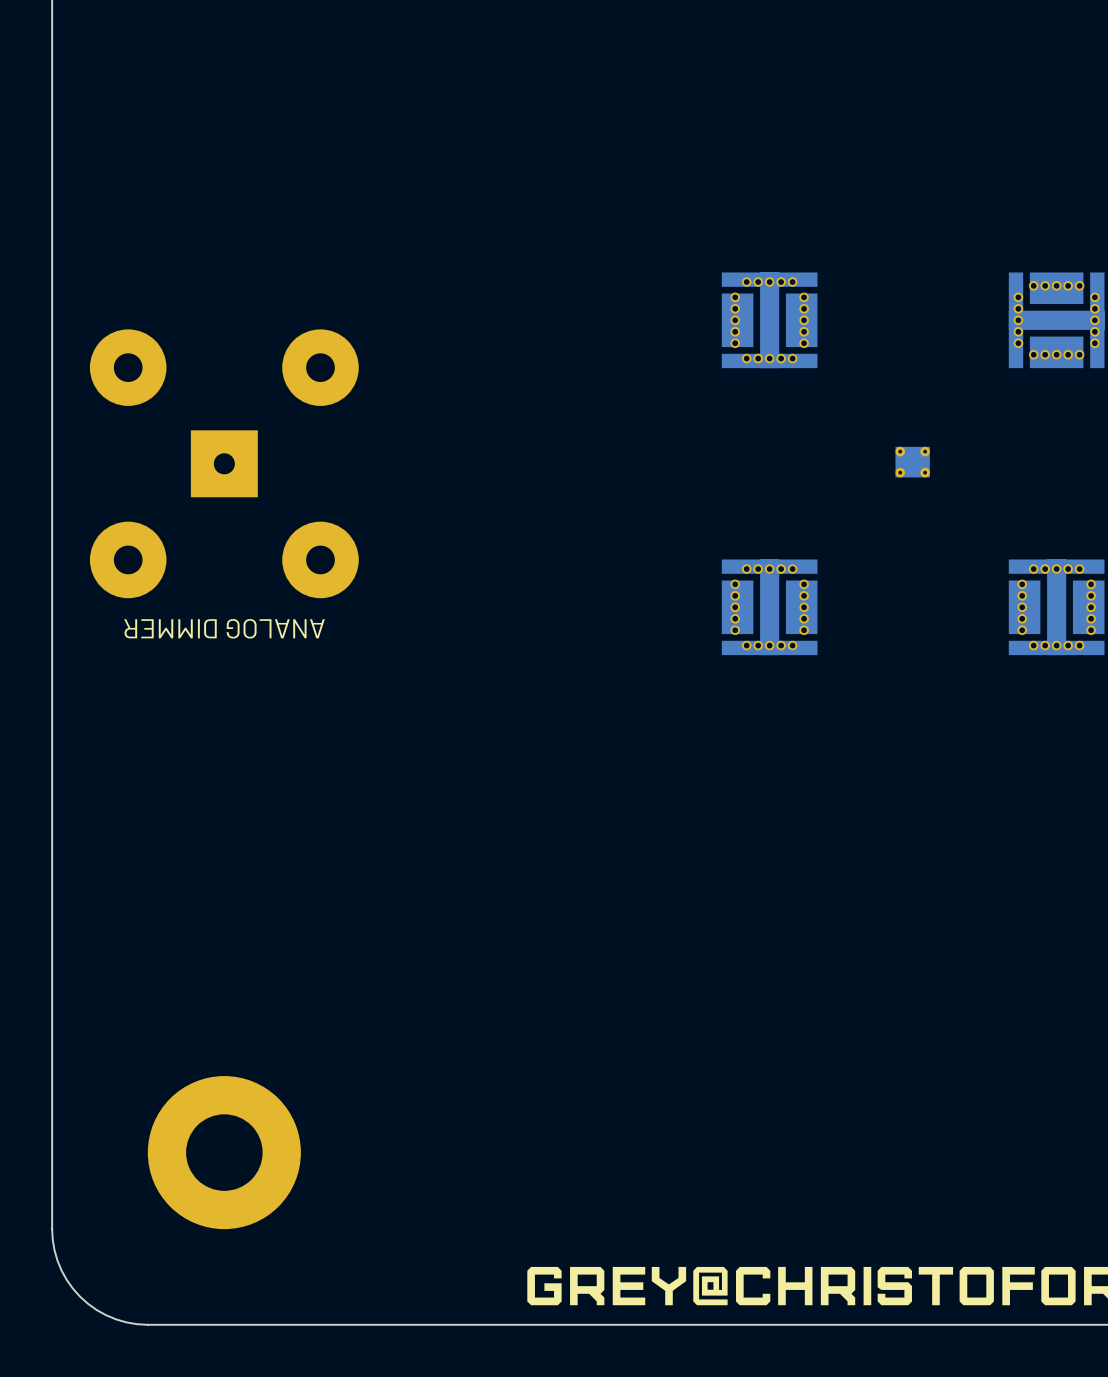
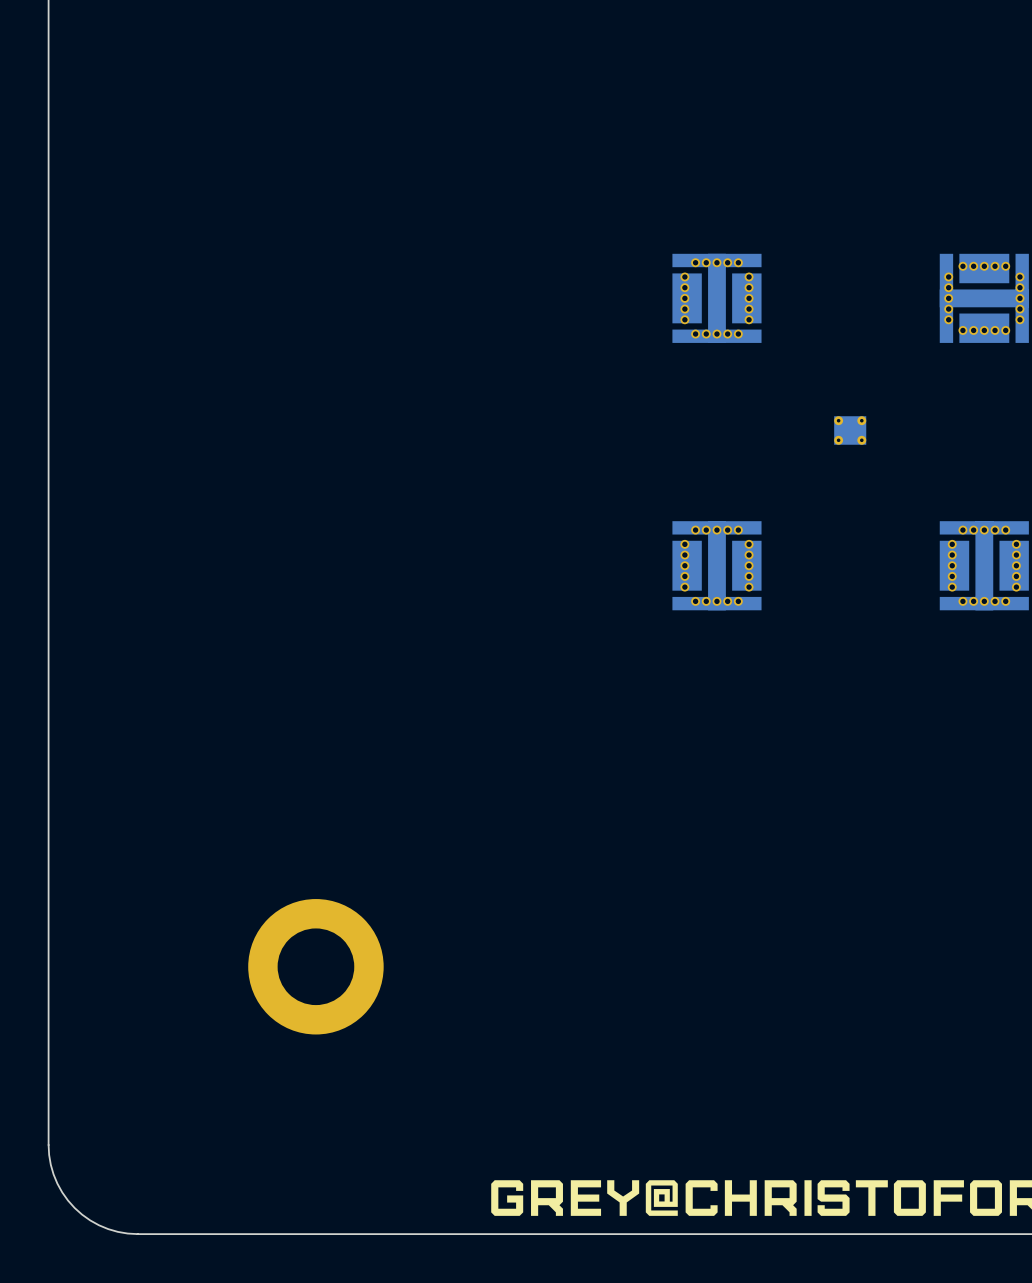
part: (224, 463) -> none
text: ANALOG DIMMER (224, 628) -> none
part: none -> (315, 966)
part: (224, 1152) -> none

